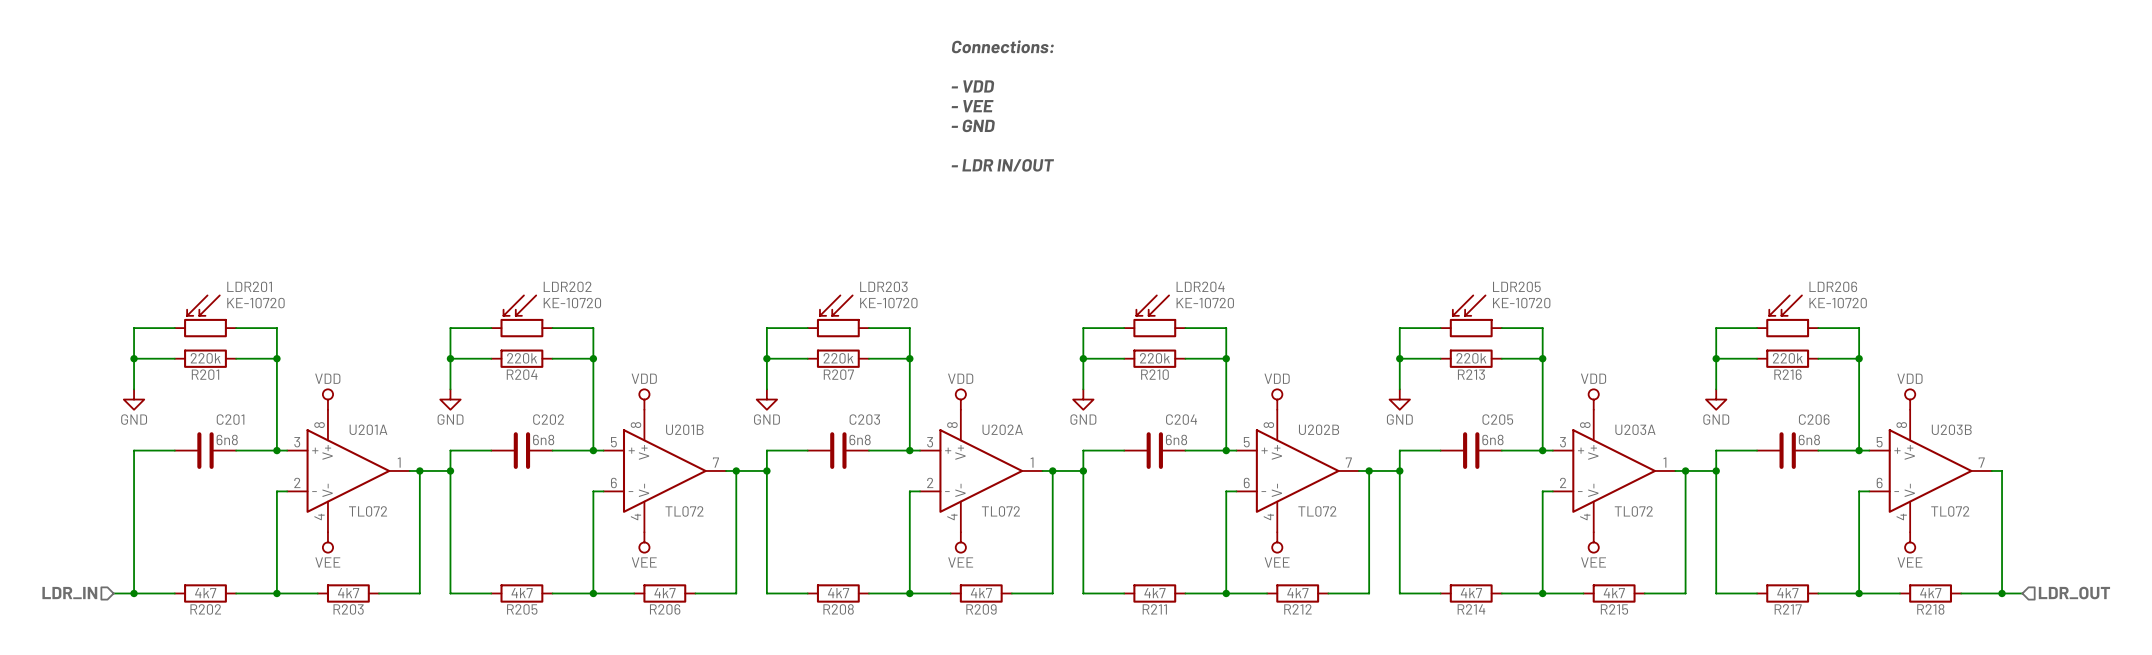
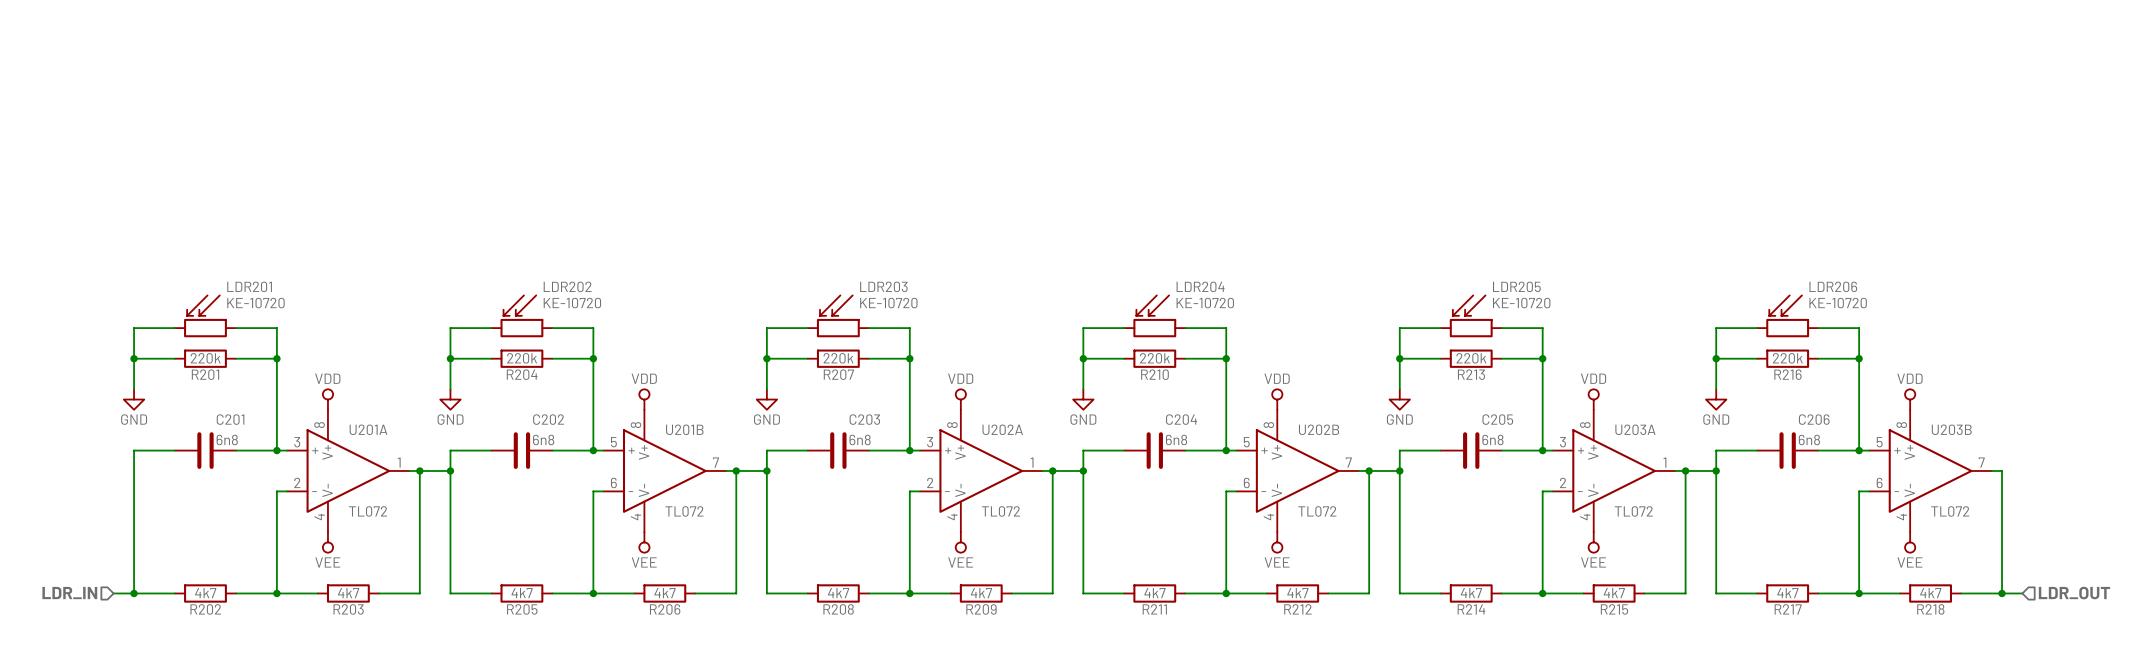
text: Connections: (1002, 46) -> none
text: - VDD (972, 86) -> none
text: - VEE (972, 106) -> none
text: - GND (973, 125) -> none
text: - LDR IN/OUT (1002, 165) -> none

